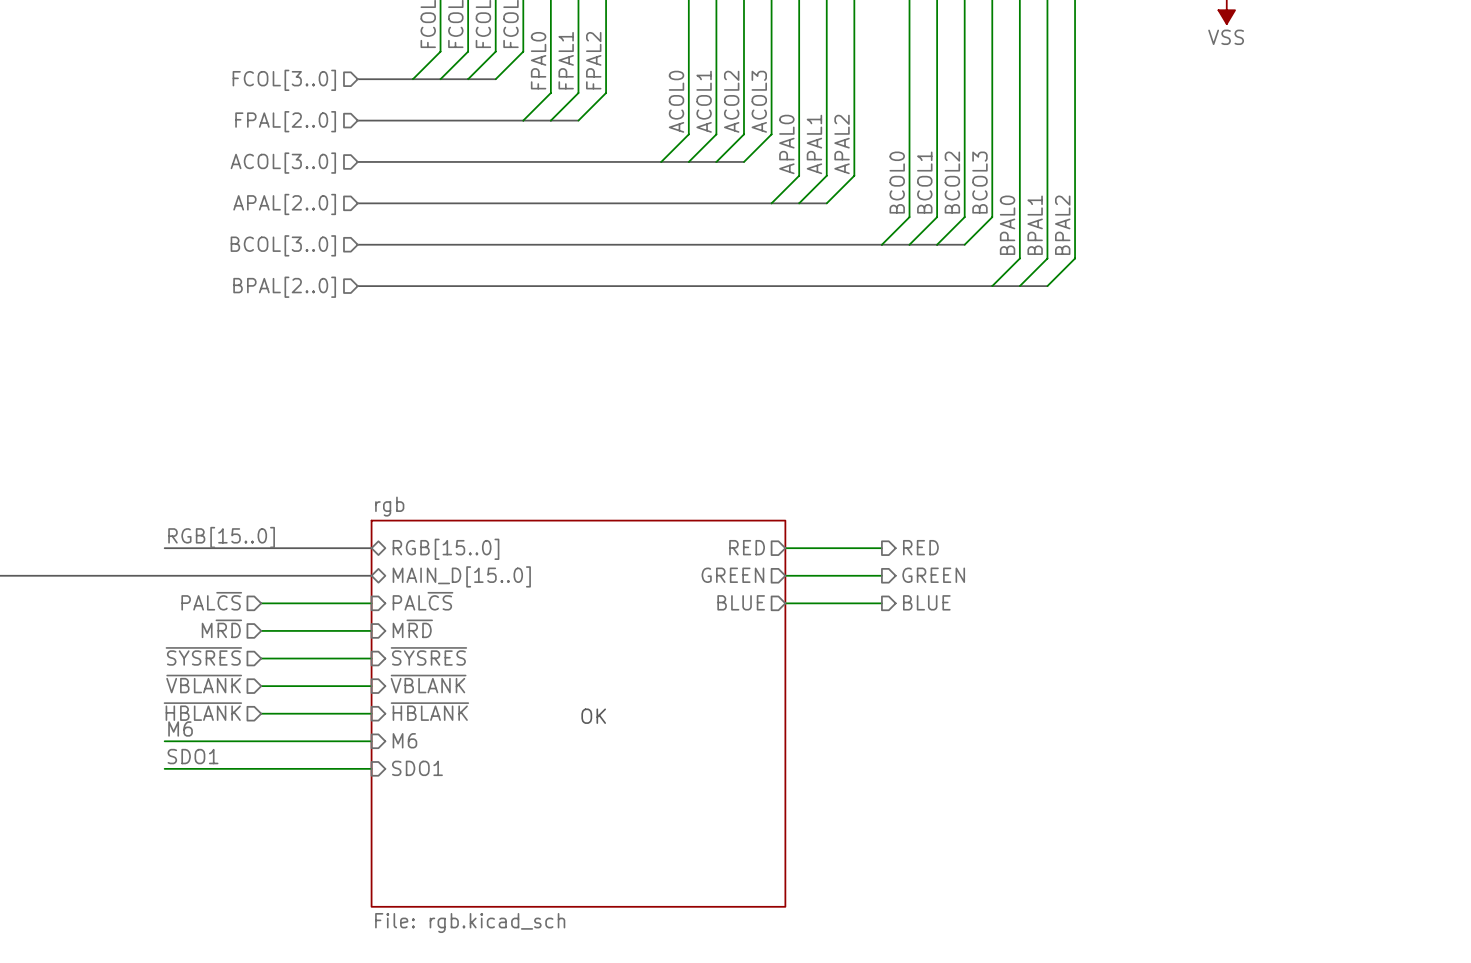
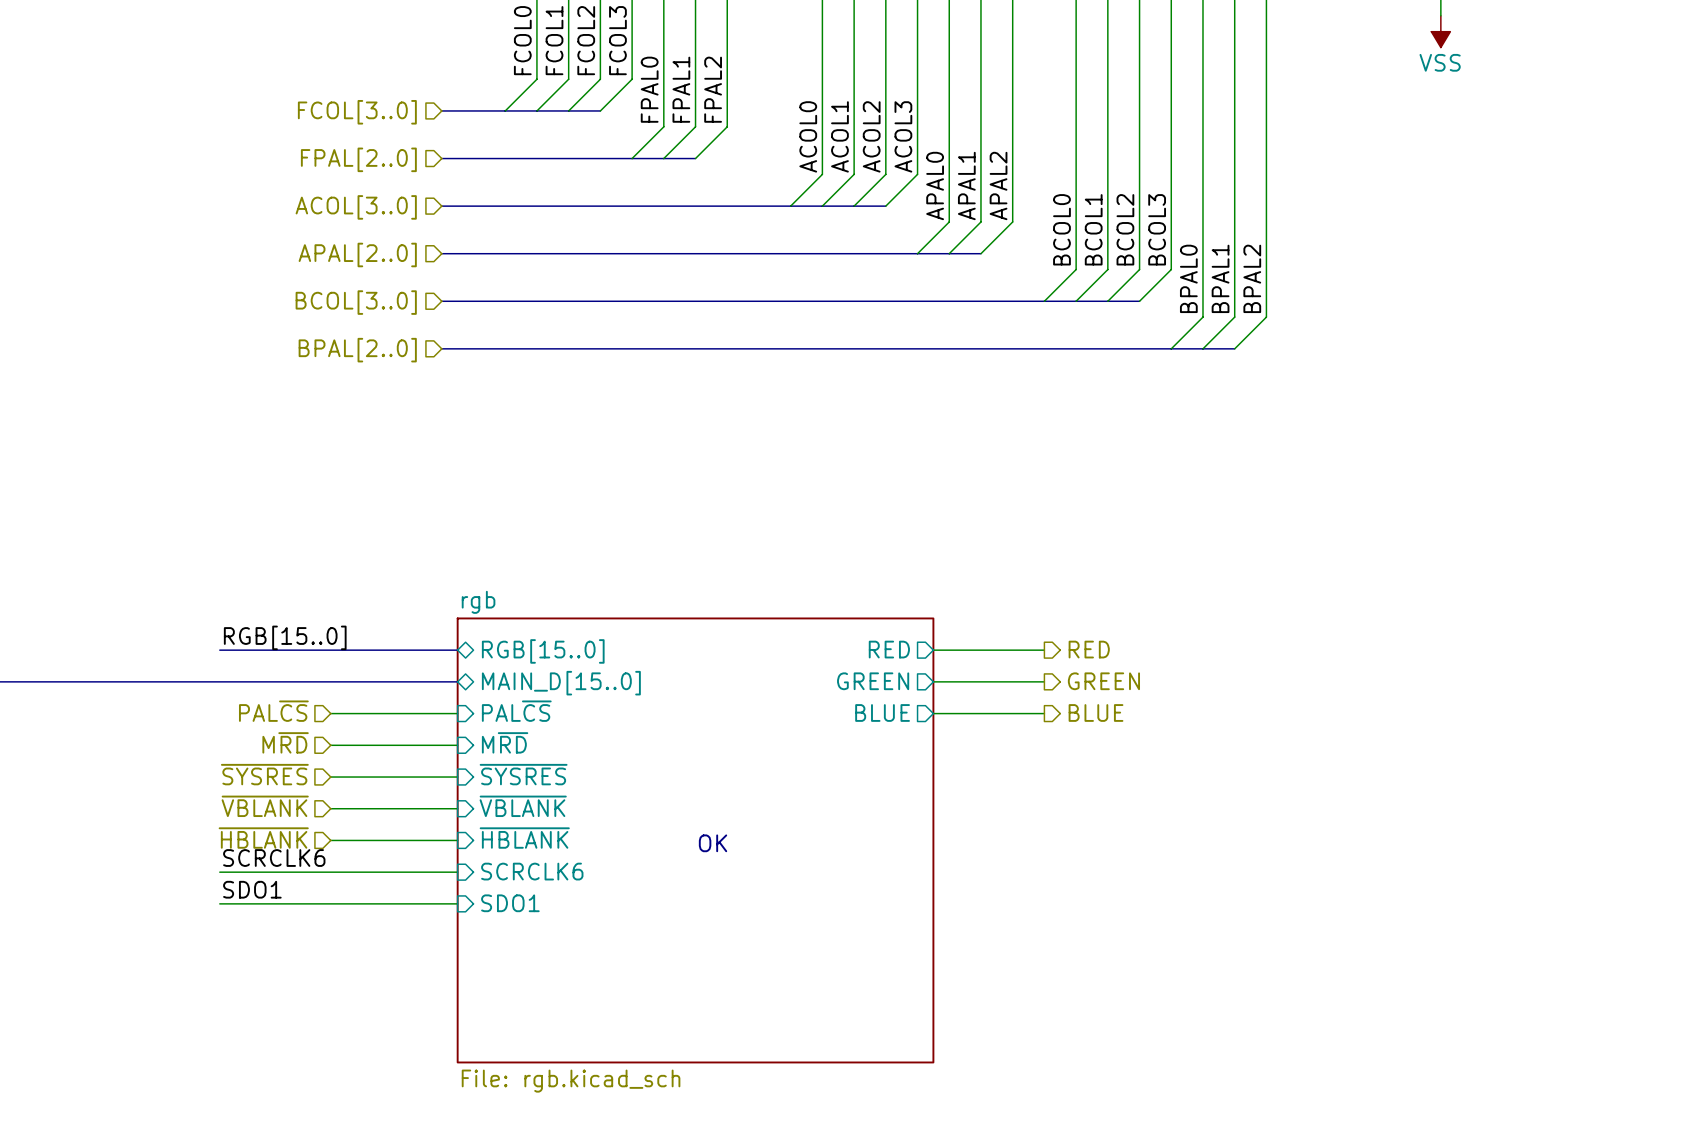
label: M6 (180, 728) -> SCRCLK6 (274, 858)
sheet pin: M6 (404, 740) -> SCRCLK6 (532, 871)

